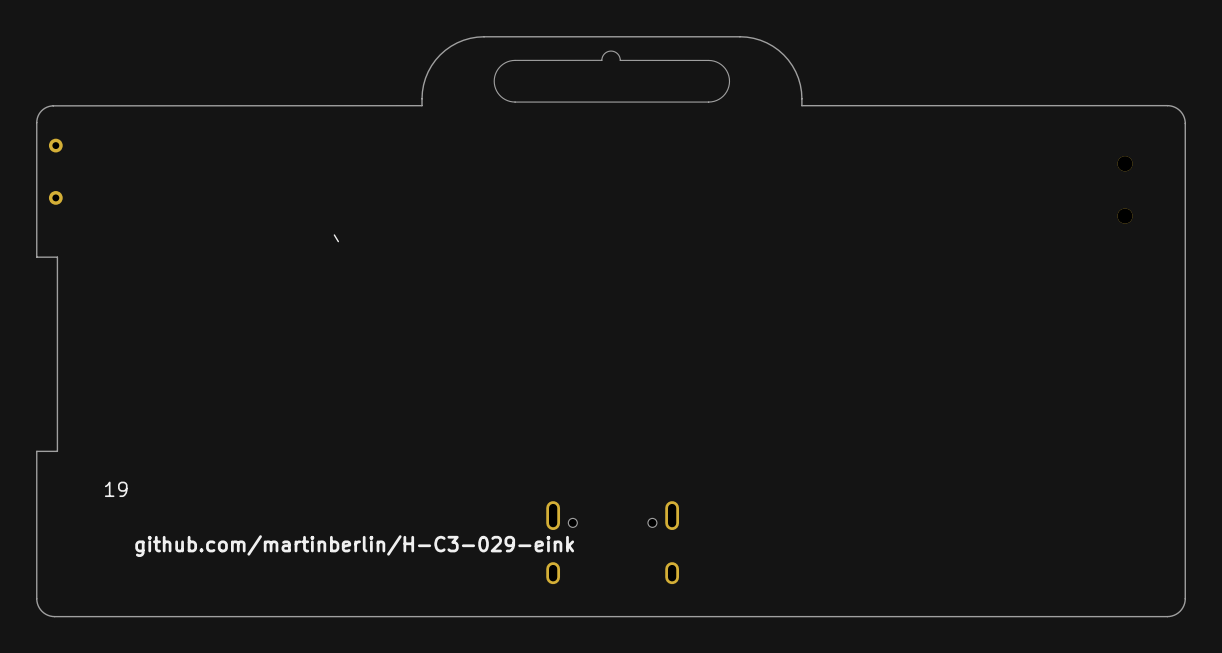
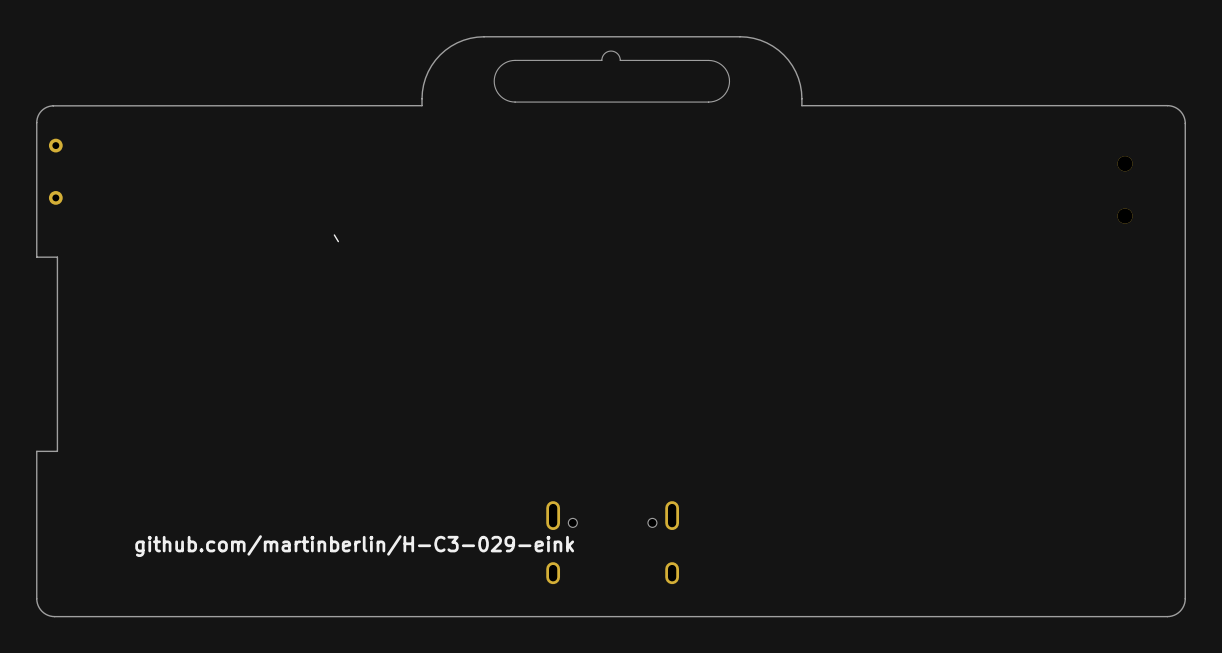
text: 19 (116, 489) -> none

